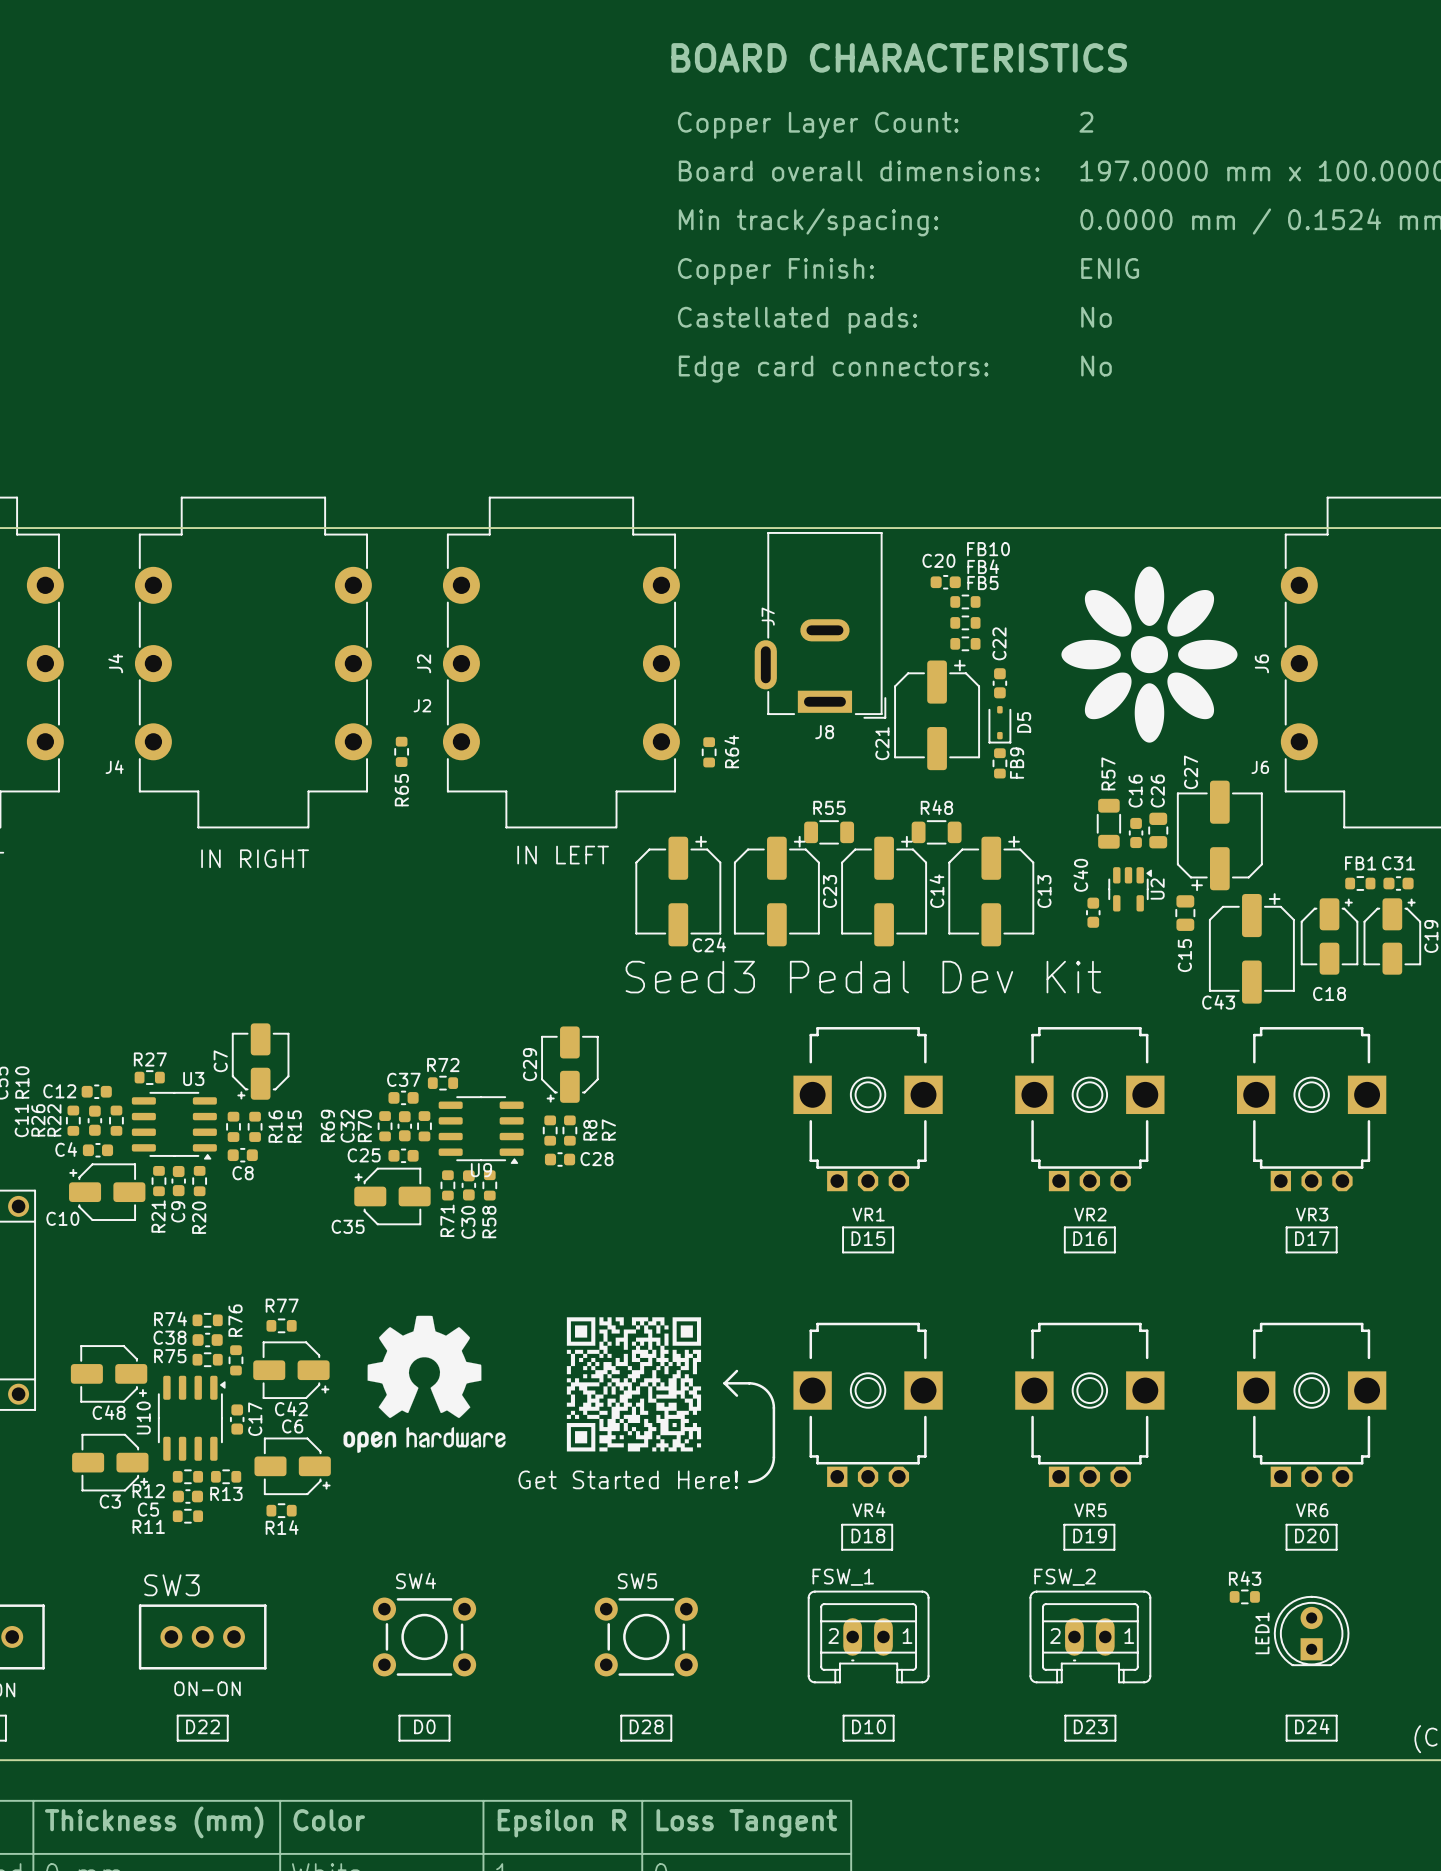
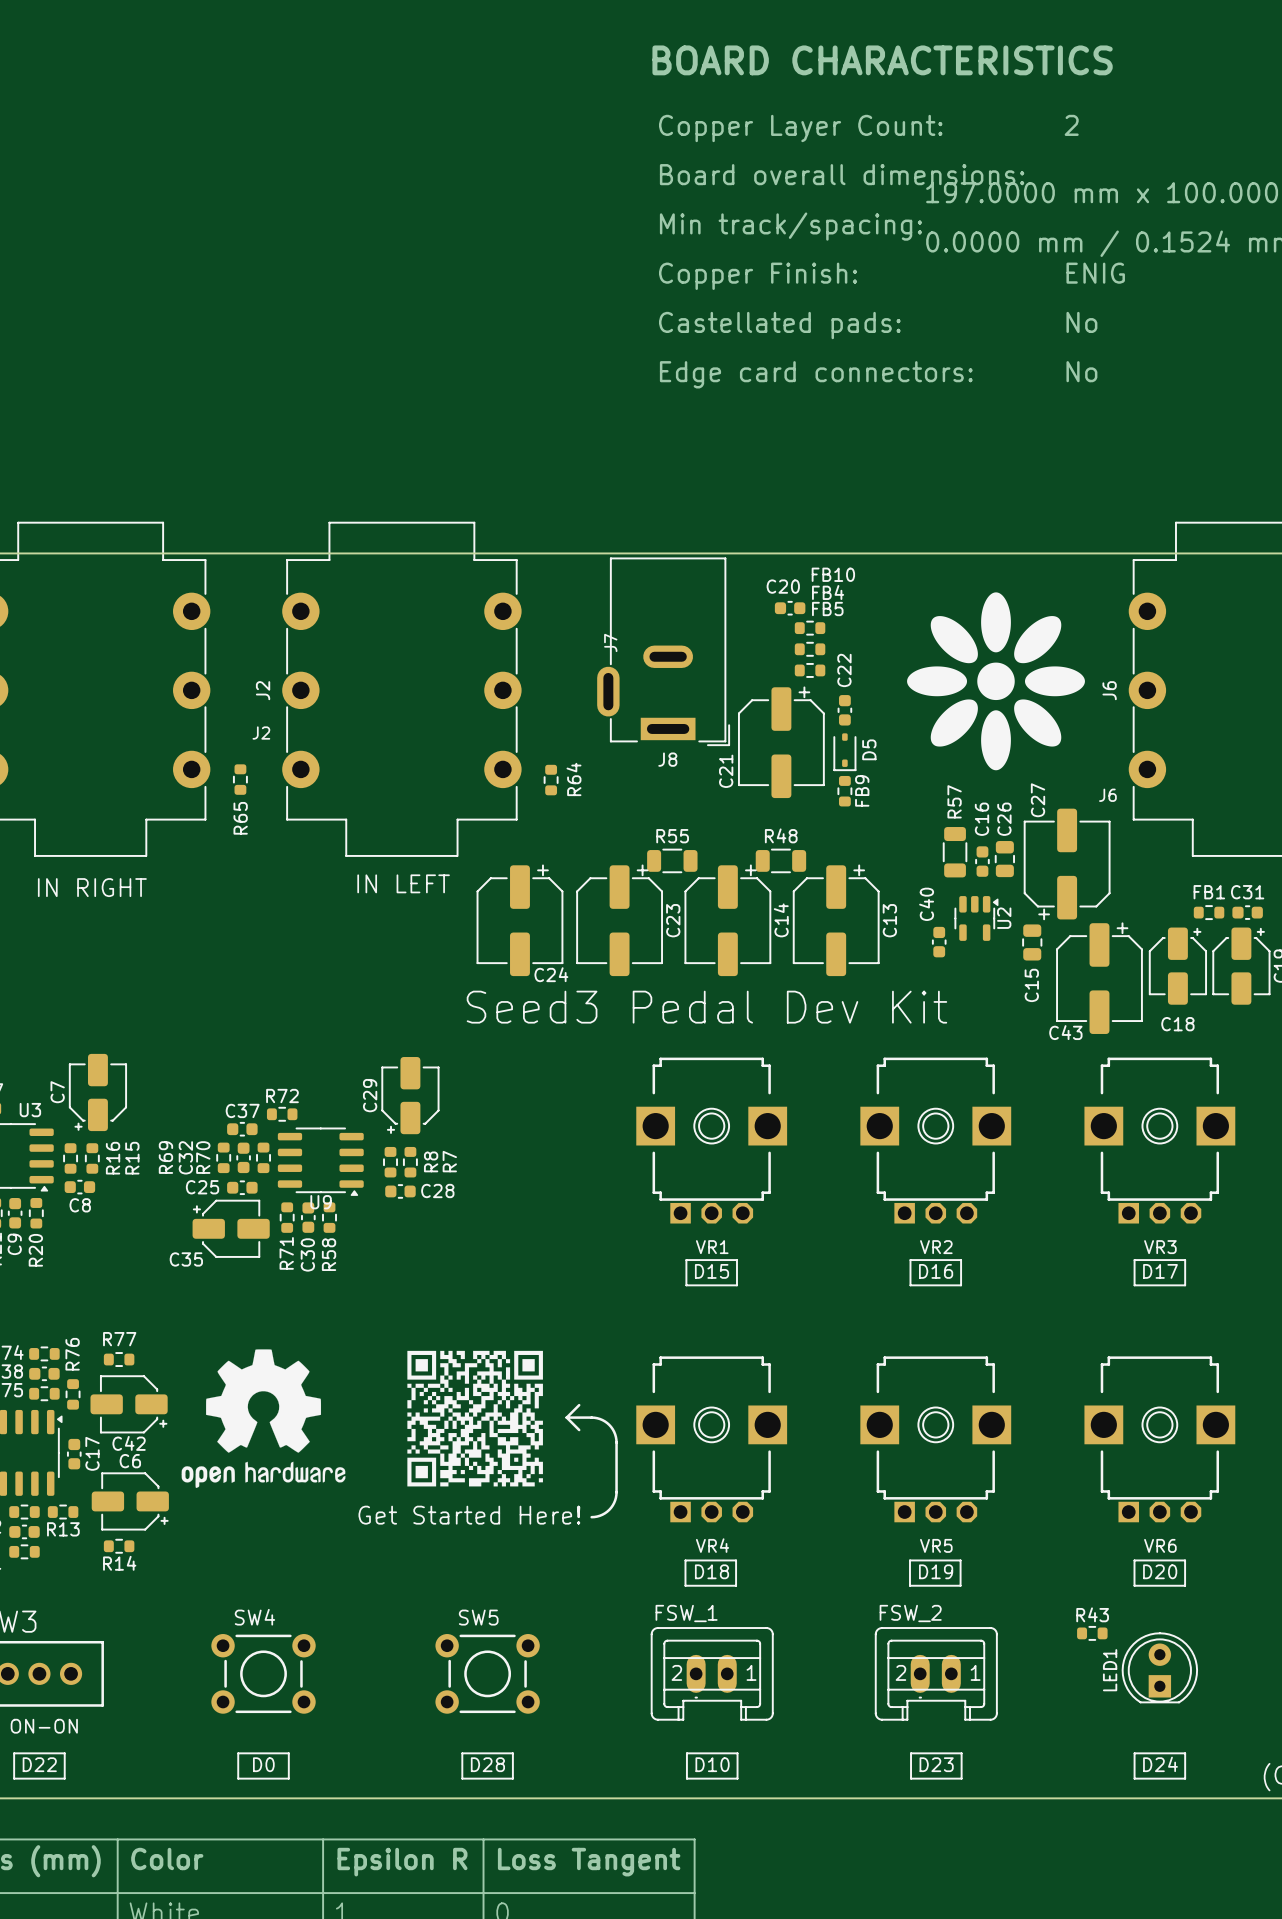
text position: BOARD CHARACTERISTICS (899, 57) -> BOARD CHARACTERISTICS (882, 60)
text position: 2 (1086, 122) -> 2 (1071, 125)
text position: Copper Layer Count: (818, 125) -> Copper Layer Count: (800, 128)
text position: Board overall dimensions: (859, 170) -> Board overall dimensions: (842, 174)
text position: Min track/spacing: (808, 222) -> Min track/spacing: (790, 226)
text position: ENIG (1110, 268) -> ENIG (1095, 273)
text position: Copper Finish: (775, 271) -> Copper Finish: (758, 276)
text: none -> No (1081, 322)
text: No (1096, 317) -> none
text position: Castellated pads: (797, 320) -> Castellated pads: (779, 325)
text: none -> No (1081, 371)
text: No (1096, 366) -> none
text position: Edge card connectors: (833, 369) -> Edge card connectors: (816, 374)

